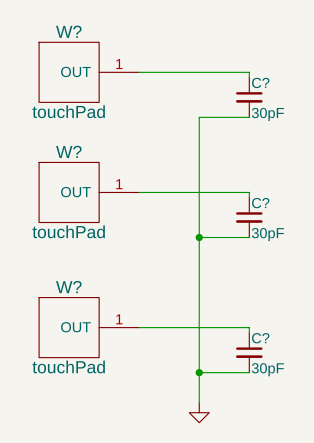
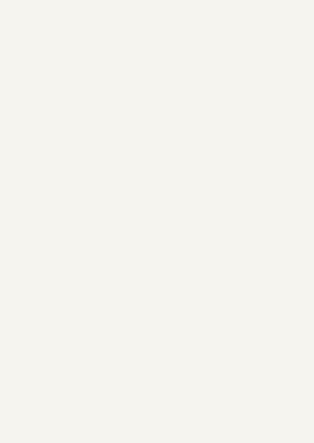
W?: touchPad (89, 72) -> none
wire: (139, 72) (249, 72) (249, 77) -> none
C?: 30pF (249, 97) -> none
wire: (249, 117) (199, 117) (199, 402) -> none
W?: touchPad (89, 192) -> none
wire: (139, 192) (249, 192) (249, 197) -> none
C?: 30pF (249, 217) -> none
wire: (199, 237) (249, 237) -> none
junction: (199, 237) -> none
W?: touchPad (89, 327) -> none
wire: (139, 327) (249, 327) (249, 332) -> none
C?: 30pF (249, 352) -> none
wire: (199, 372) (249, 372) -> none
junction: (199, 372) -> none
power symbol: (199, 412) -> none

